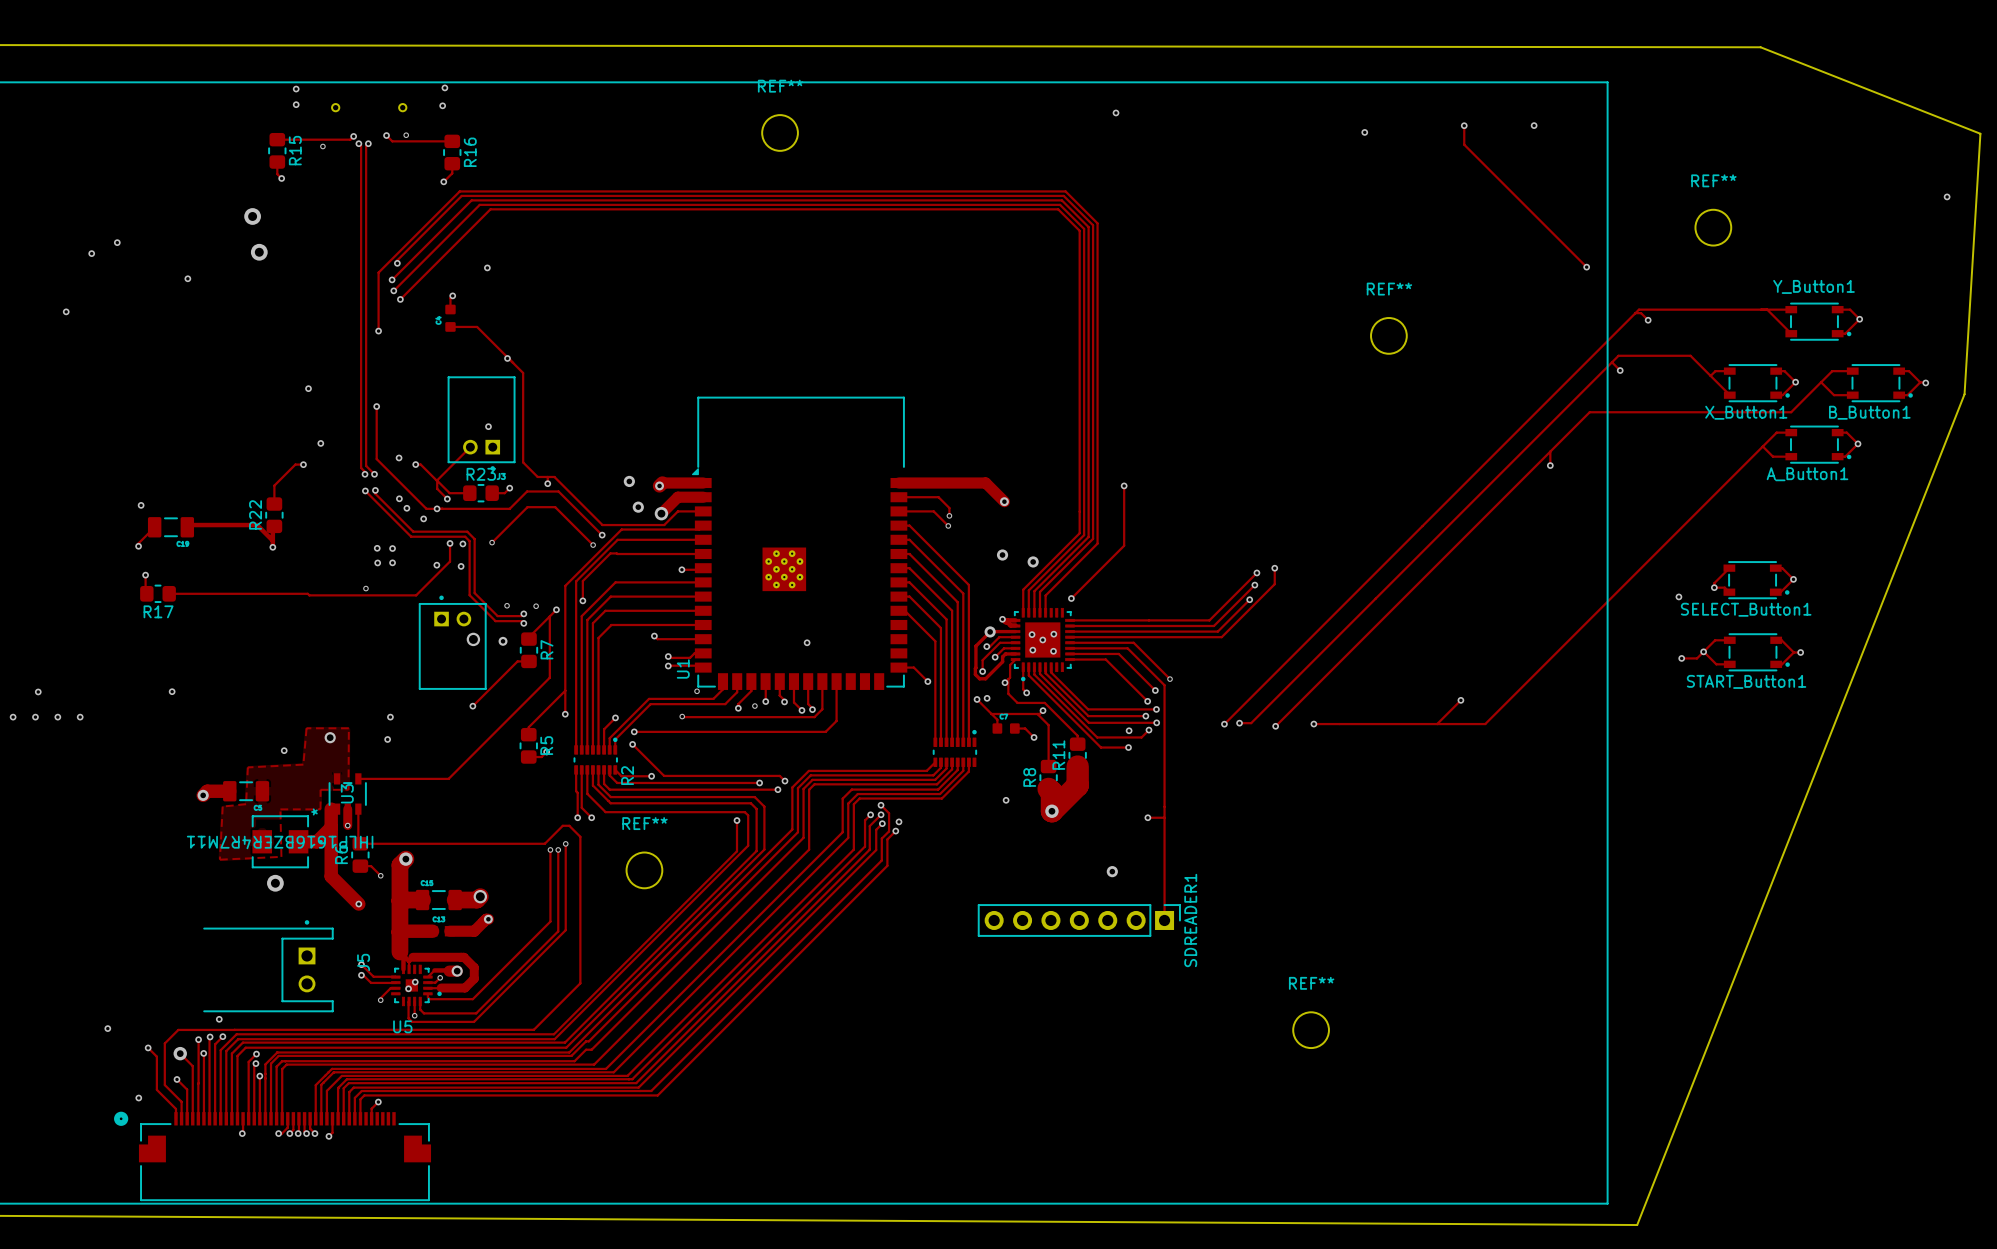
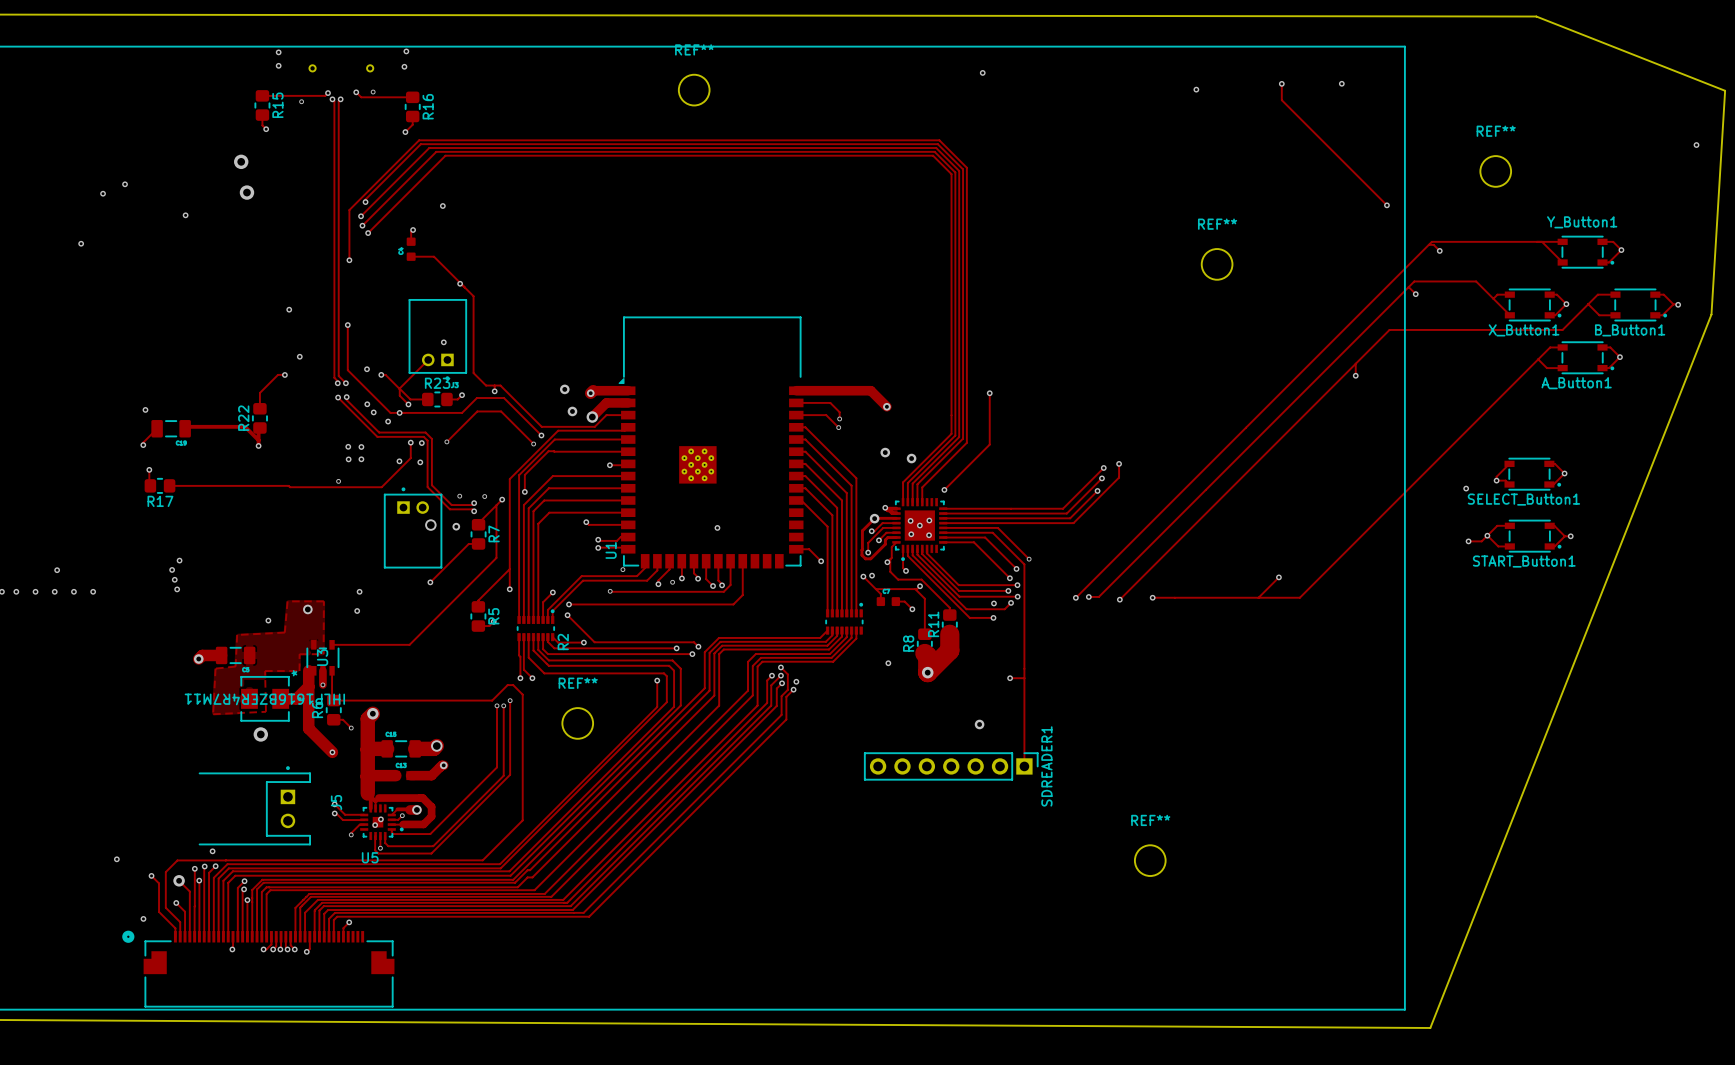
via: none -> (179, 560)
via: none -> (174, 579)
via: none -> (177, 589)

